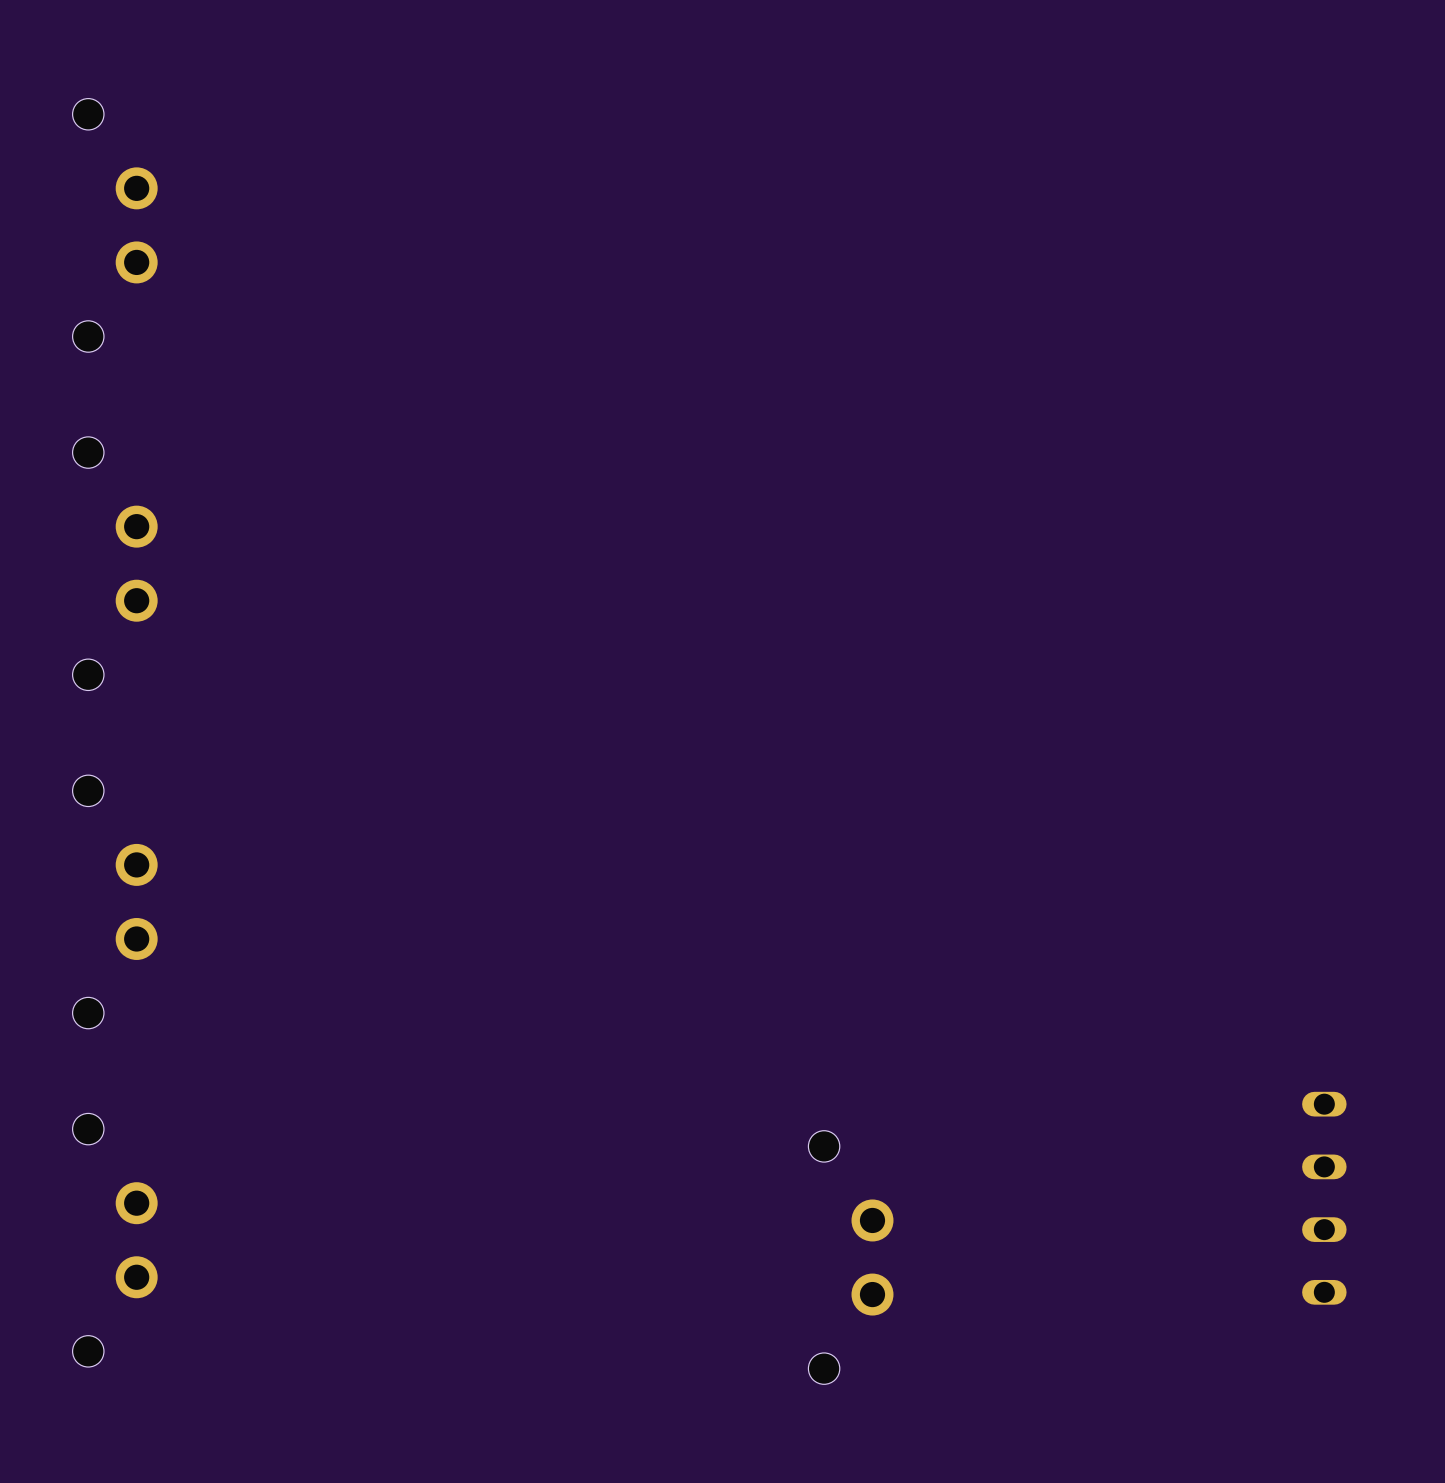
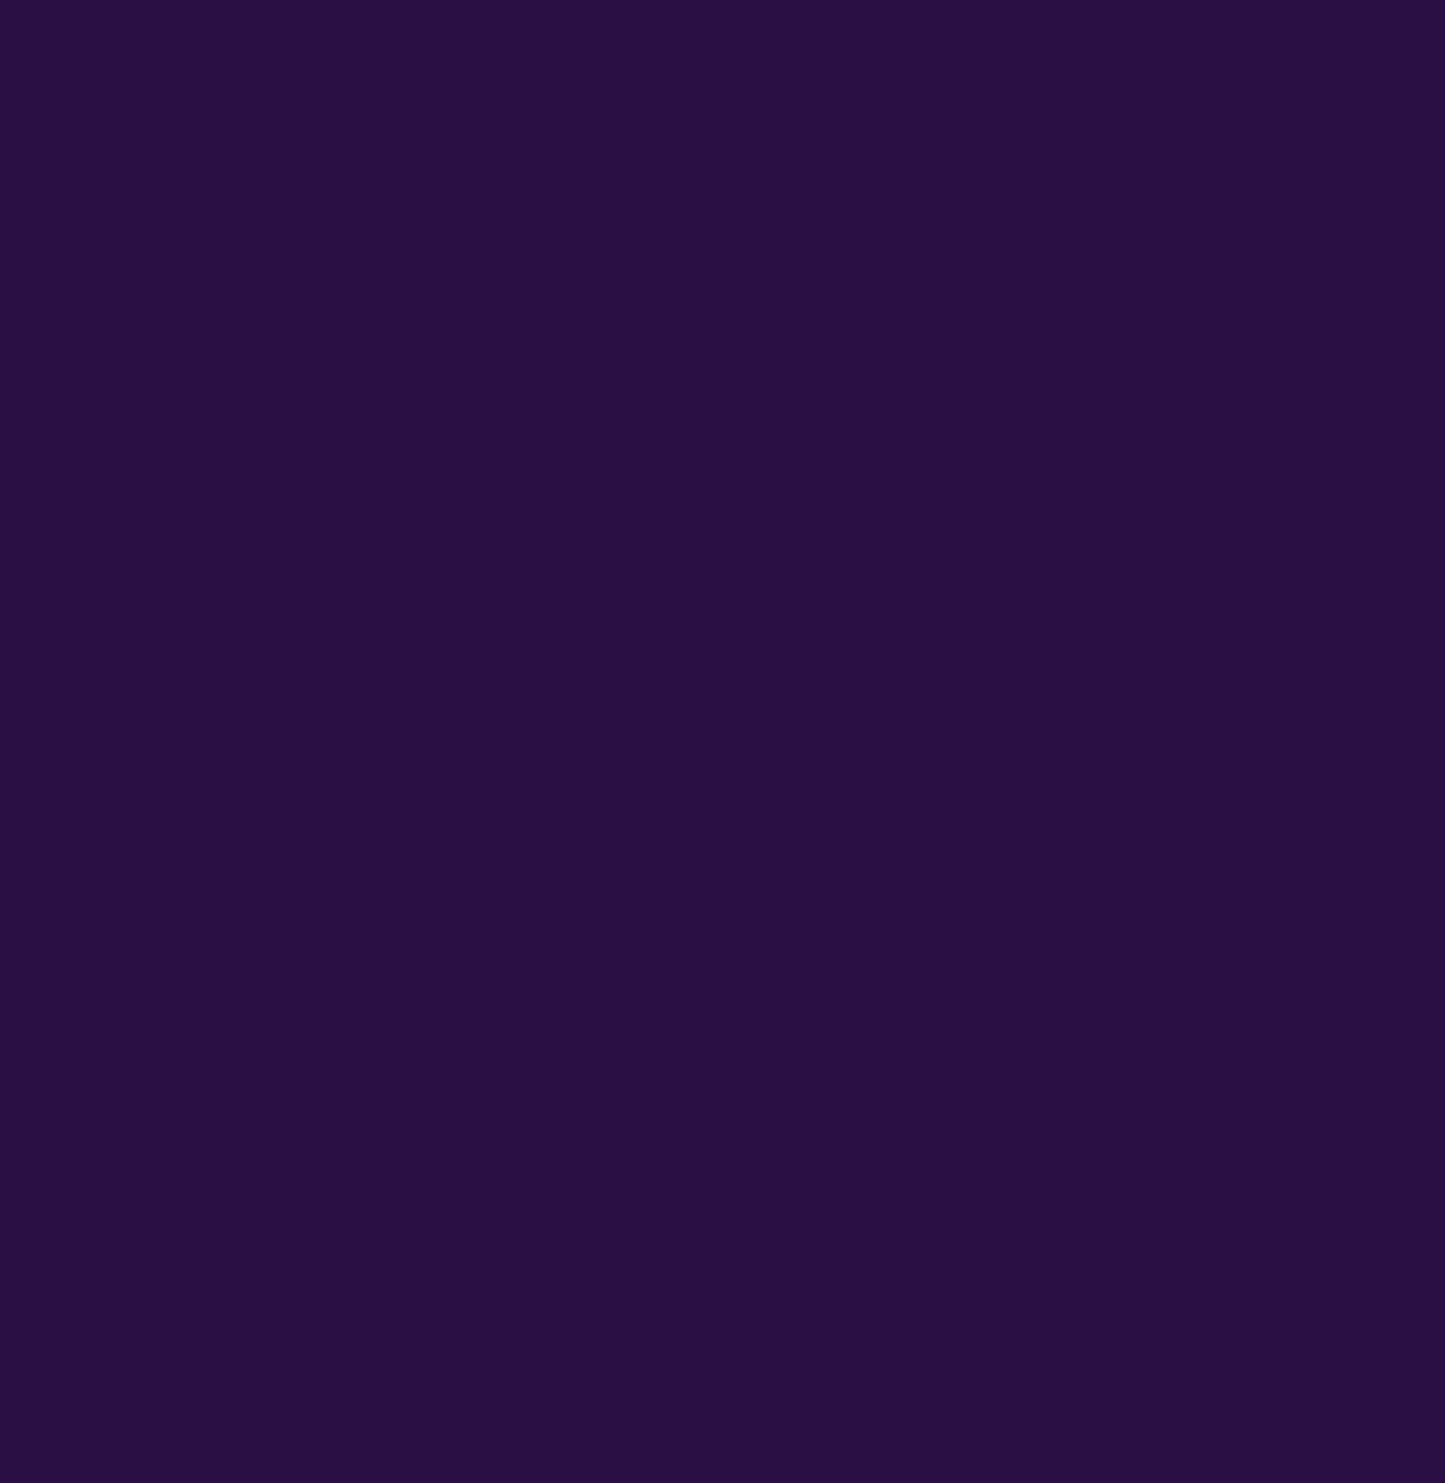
part: (115, 225) -> none
part: (115, 563) -> none
part: (115, 901) -> none
part: (1324, 1198) -> none
part: (115, 1240) -> none
part: (850, 1257) -> none

